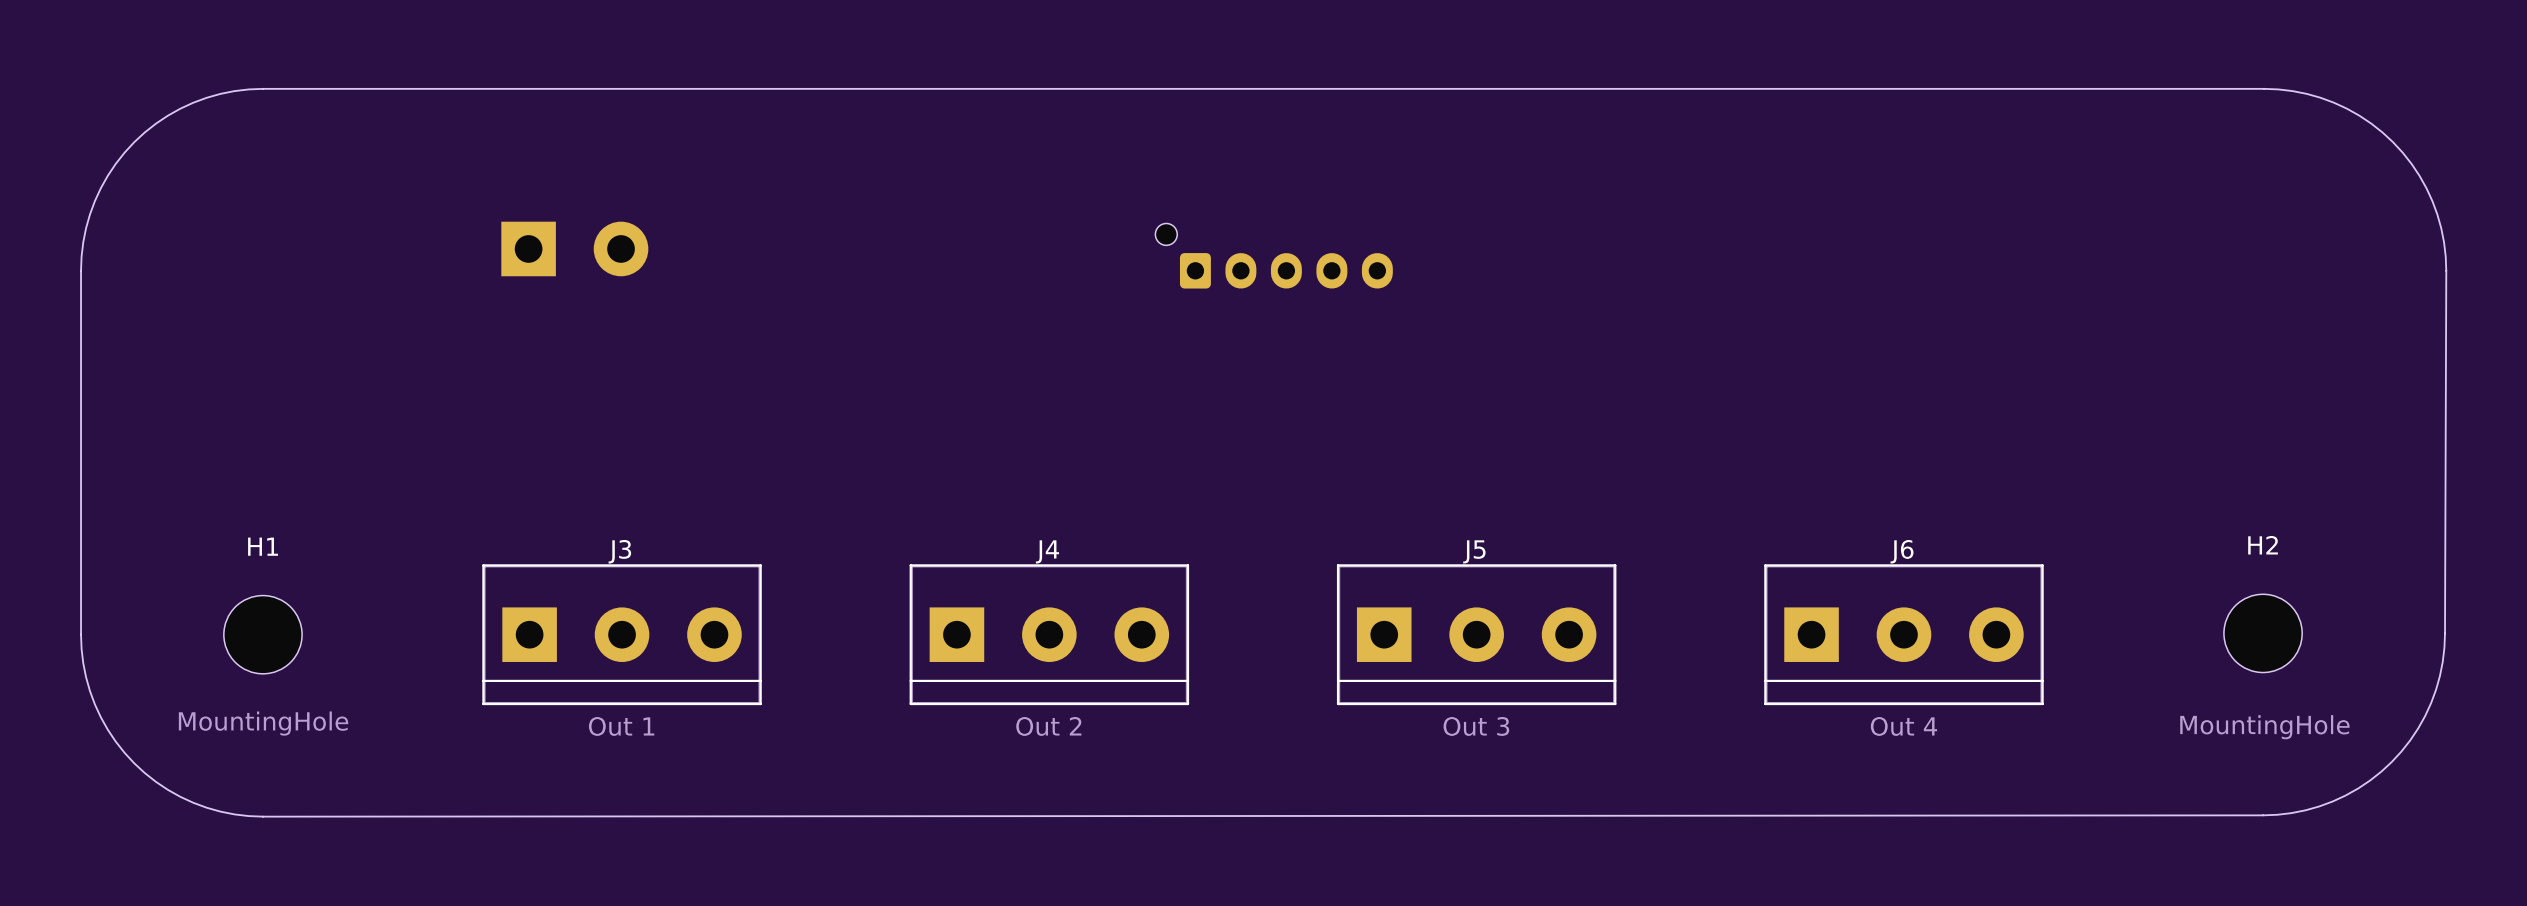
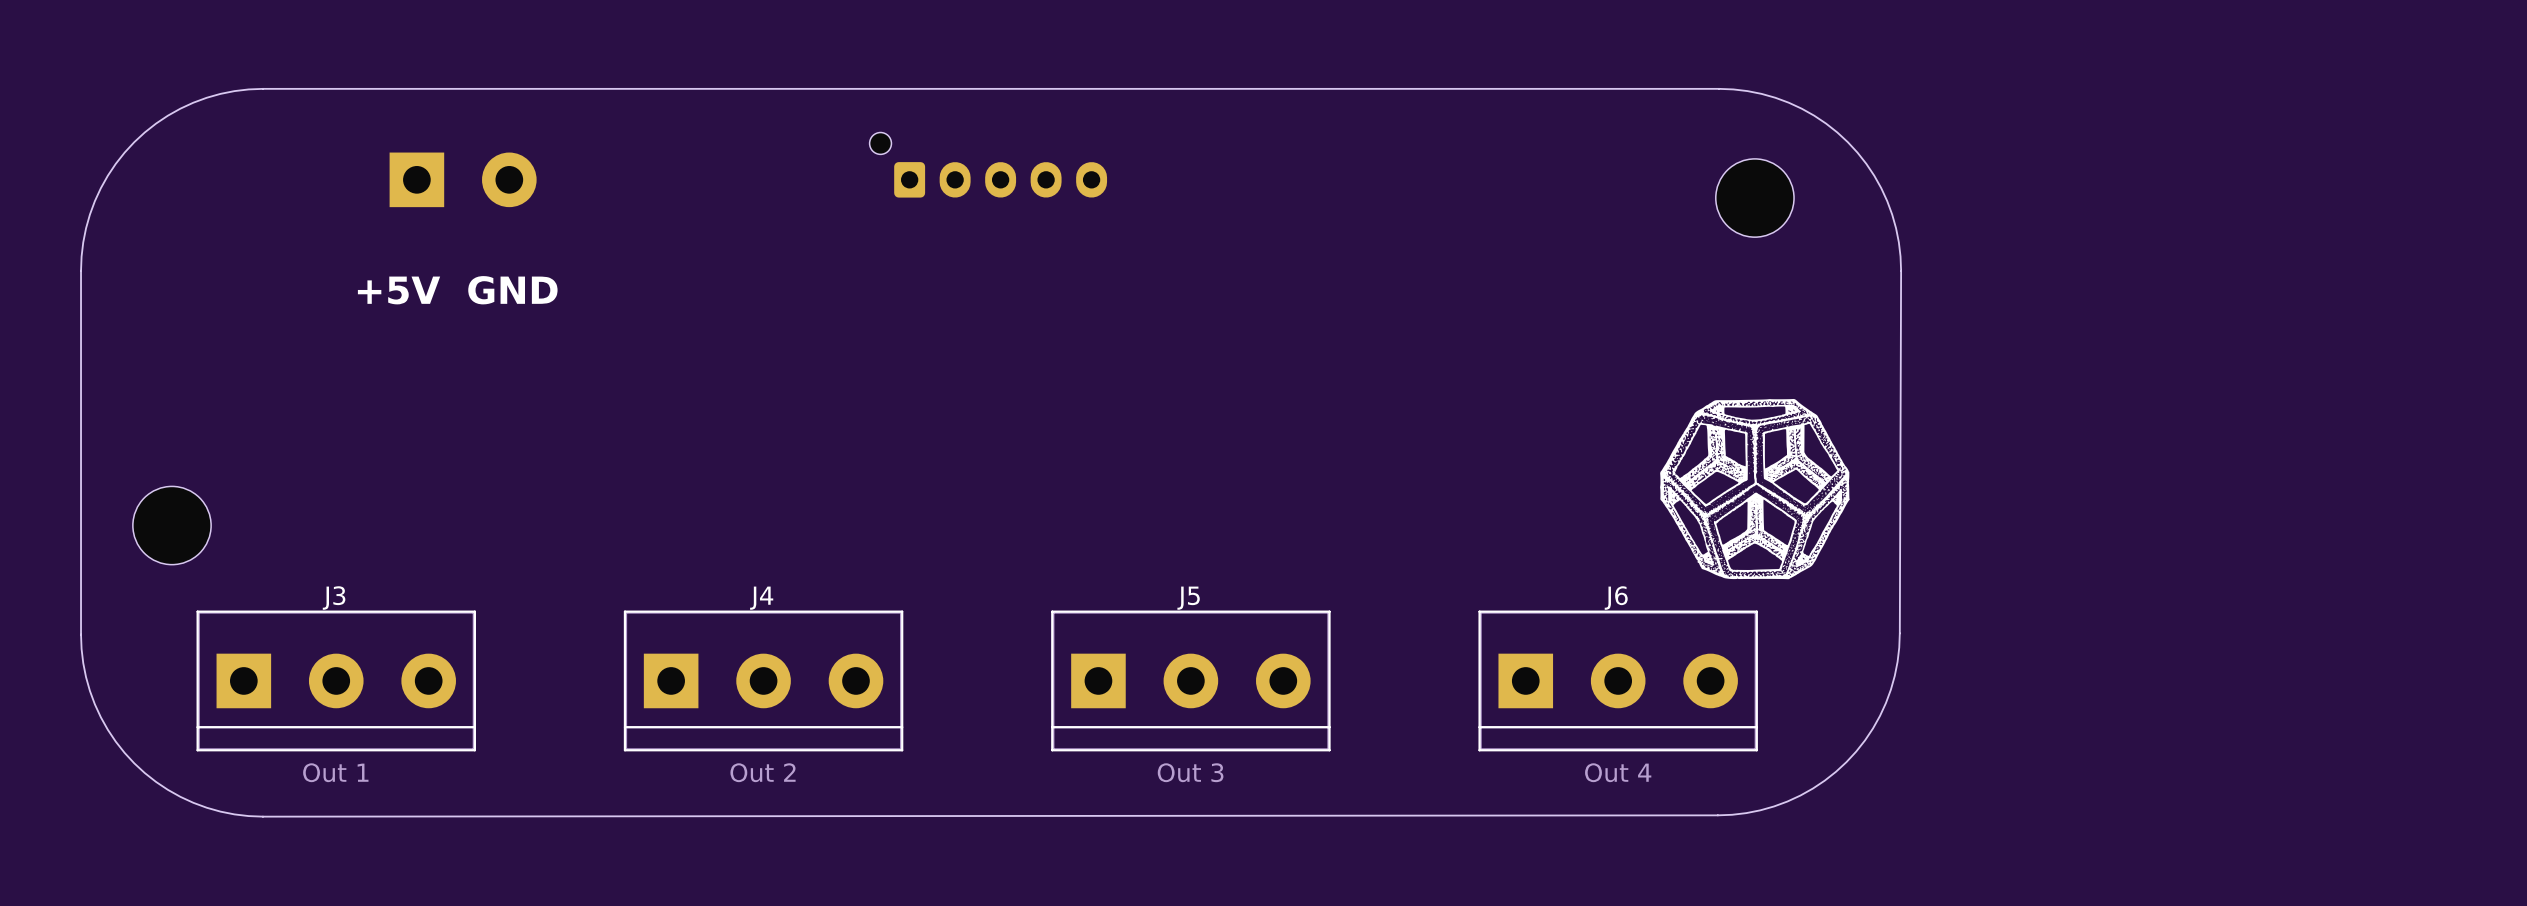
board edge: (1719, 88) (2278, 89) (2306, 93) (2333, 102) (2359, 115) (2393, 142) (2419, 175) (2432, 201) (2441, 228) (2446, 270) (2444, 647) (2436, 689) (2425, 716) (2410, 740) (2391, 762) (2358, 788) (2332, 801) (2291, 813) (2263, 815) (262, 816) -> (1719, 88) (1747, 91) (1788, 102) (1826, 123) (1847, 142) (1866, 163) (1881, 188) (1896, 228) (1900, 256) (1899, 633) (1897, 661) (1885, 703) (1865, 740) (1836, 771) (1800, 795) (1760, 810) (1717, 815) (262, 816)
part: none -> (1754, 198)
part position: (574, 248) -> (463, 179)
part position: (1274, 256) -> (988, 165)
text: none -> +5V GND (457, 290)
drawing: none -> [1660, 398, 1850, 580]
part: none -> (171, 525)
H2: MountingHole (2263, 633) -> none
H1: MountingHole (262, 634) -> none
J3 position: (622, 634) -> (336, 680)
J4 position: (1049, 634) -> (763, 680)
J5 position: (1476, 634) -> (1190, 680)
J6 position: (1903, 634) -> (1618, 680)

